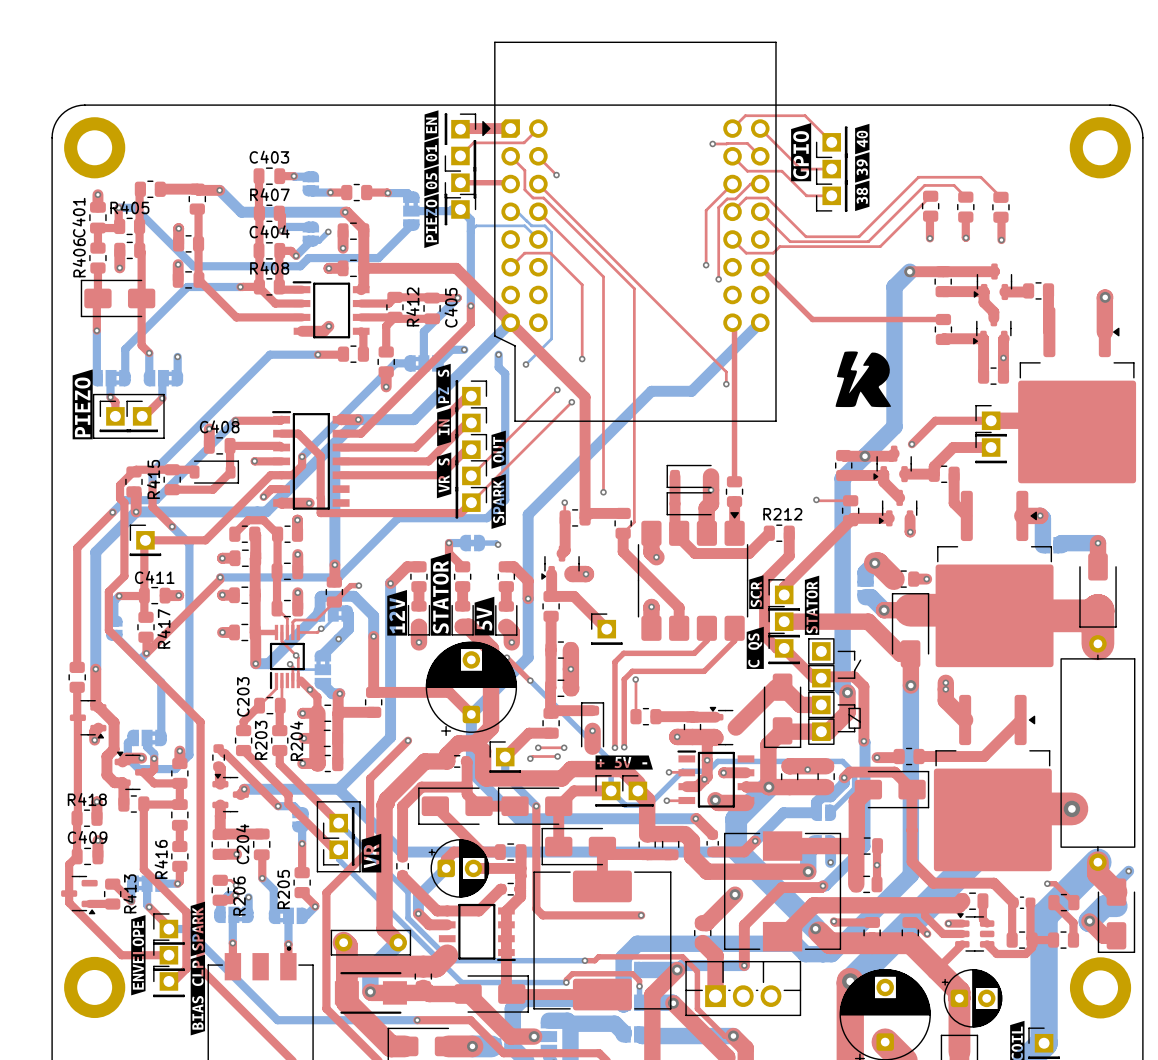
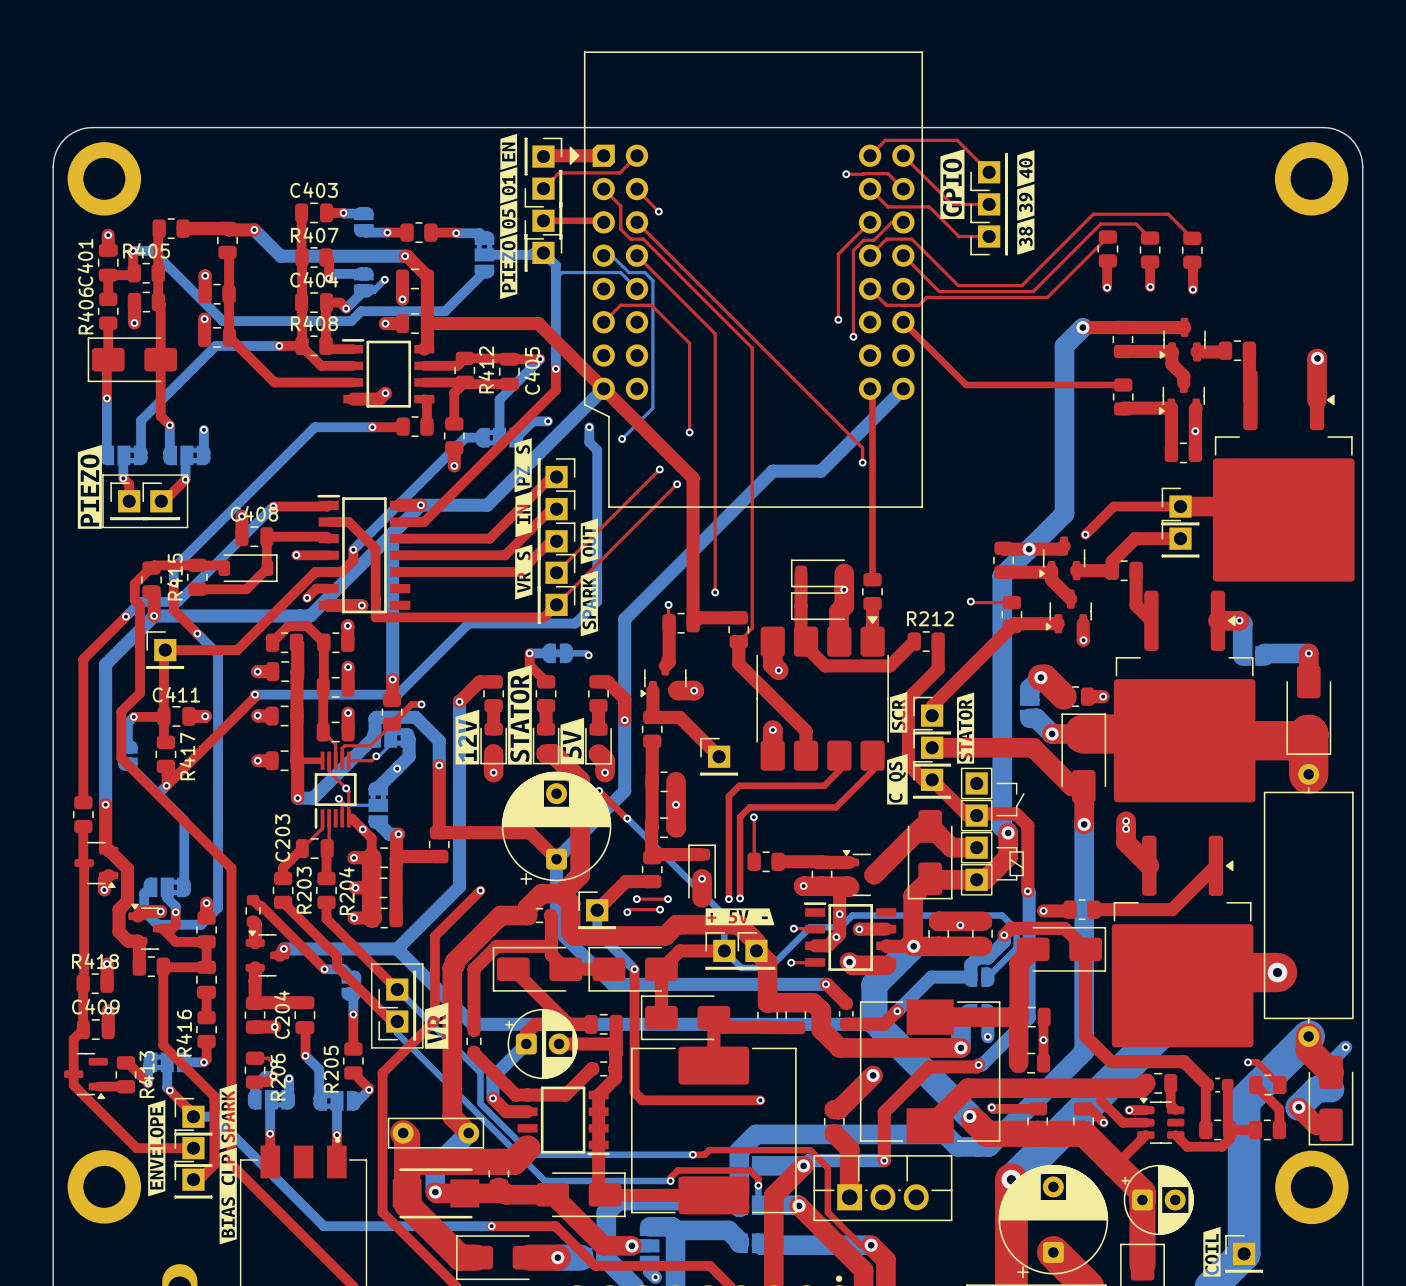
drawing: [835, 351, 892, 408] -> none

